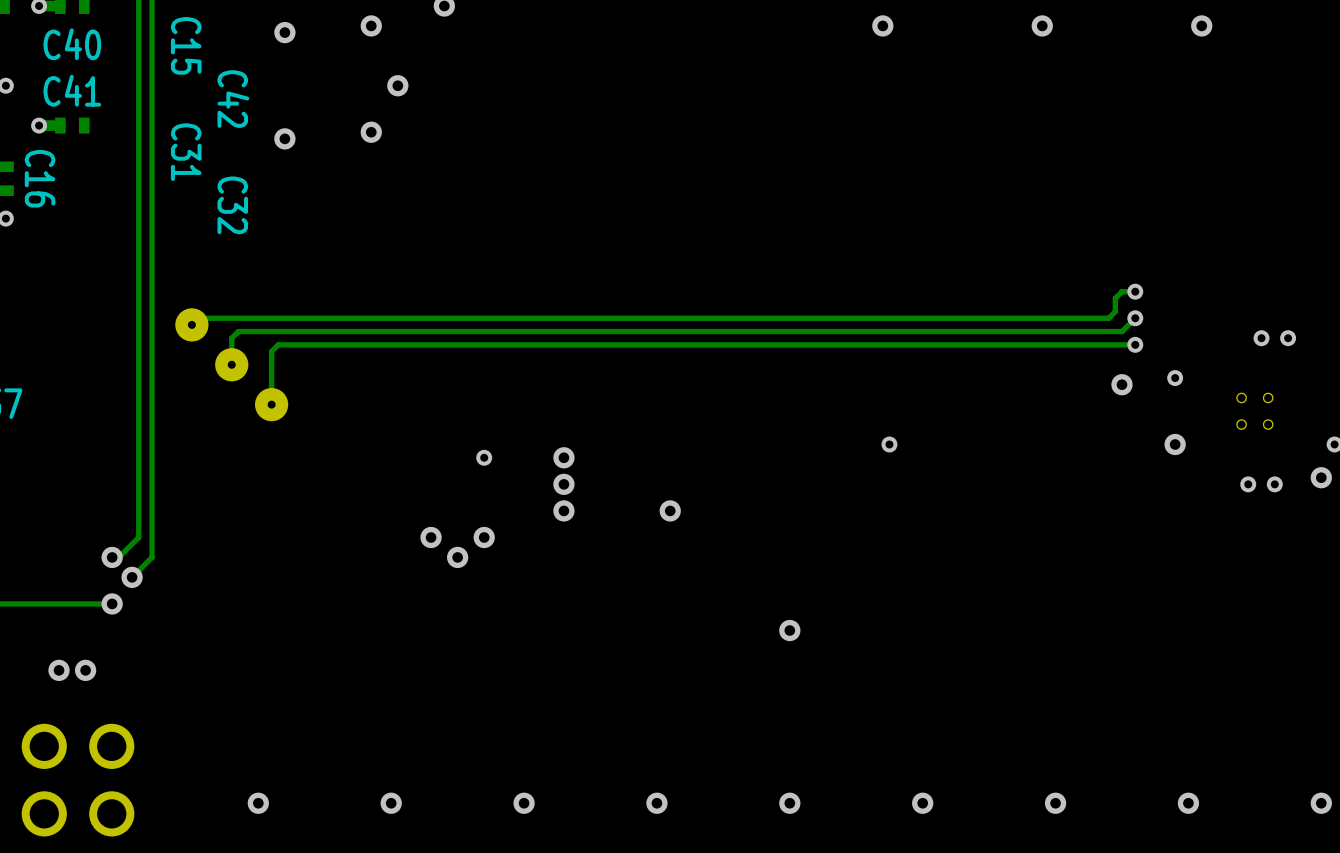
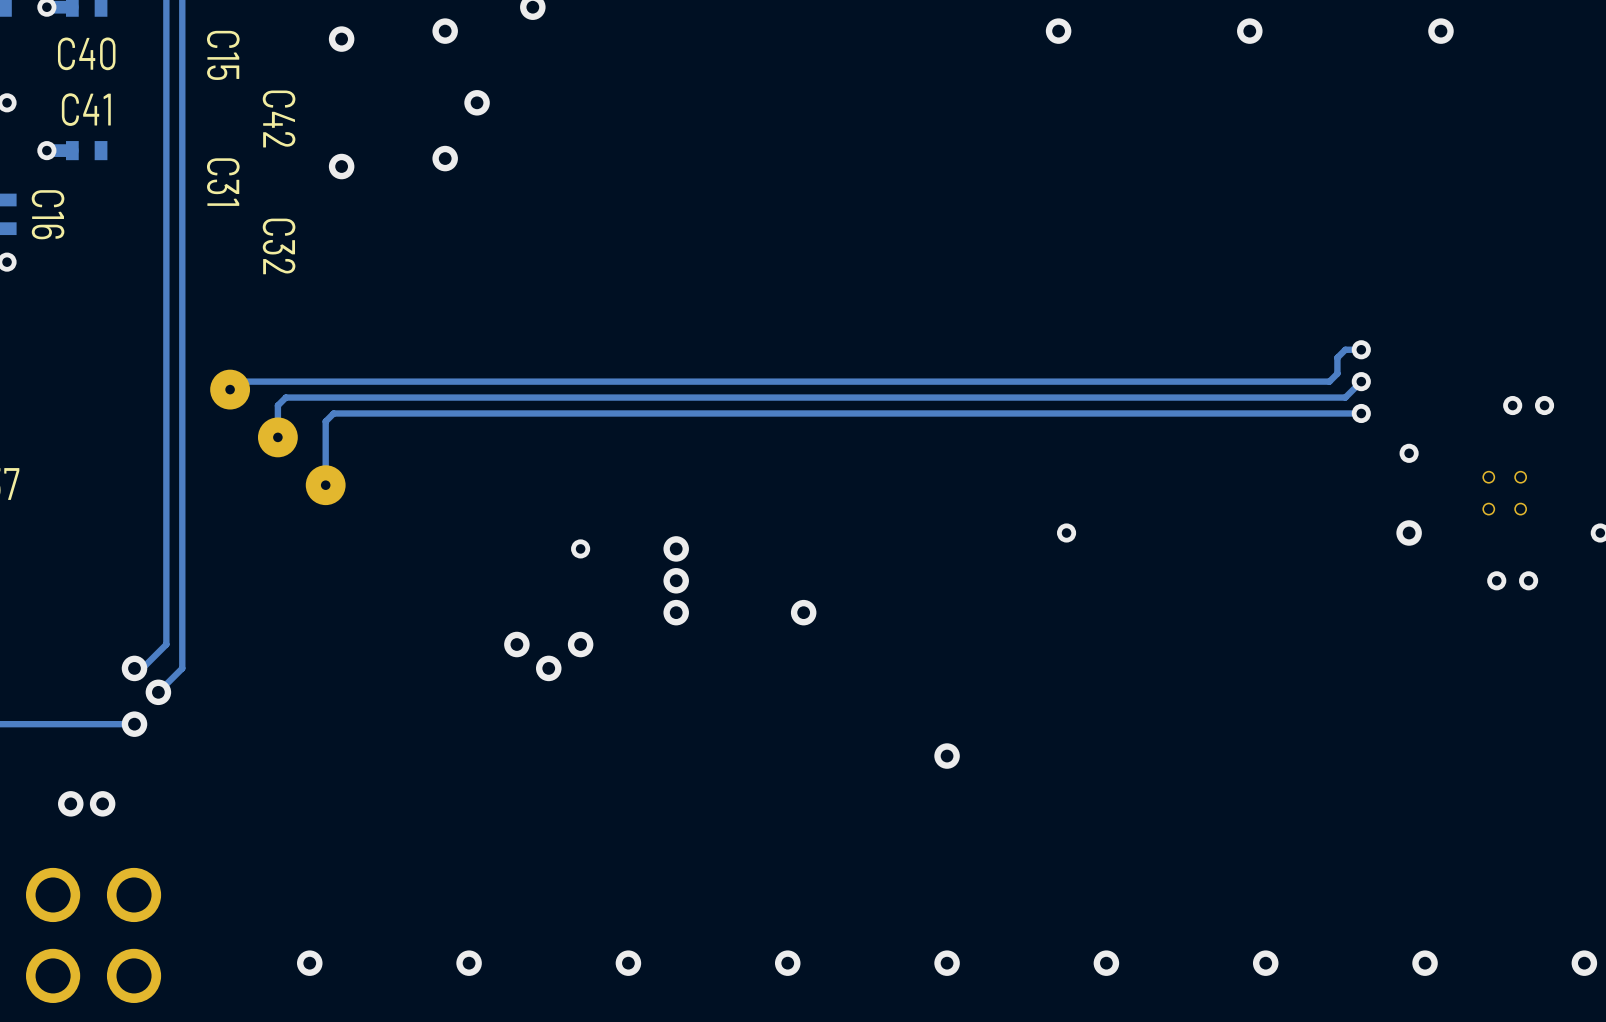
via: (1122, 384) -> none
via: (1321, 477) -> none

